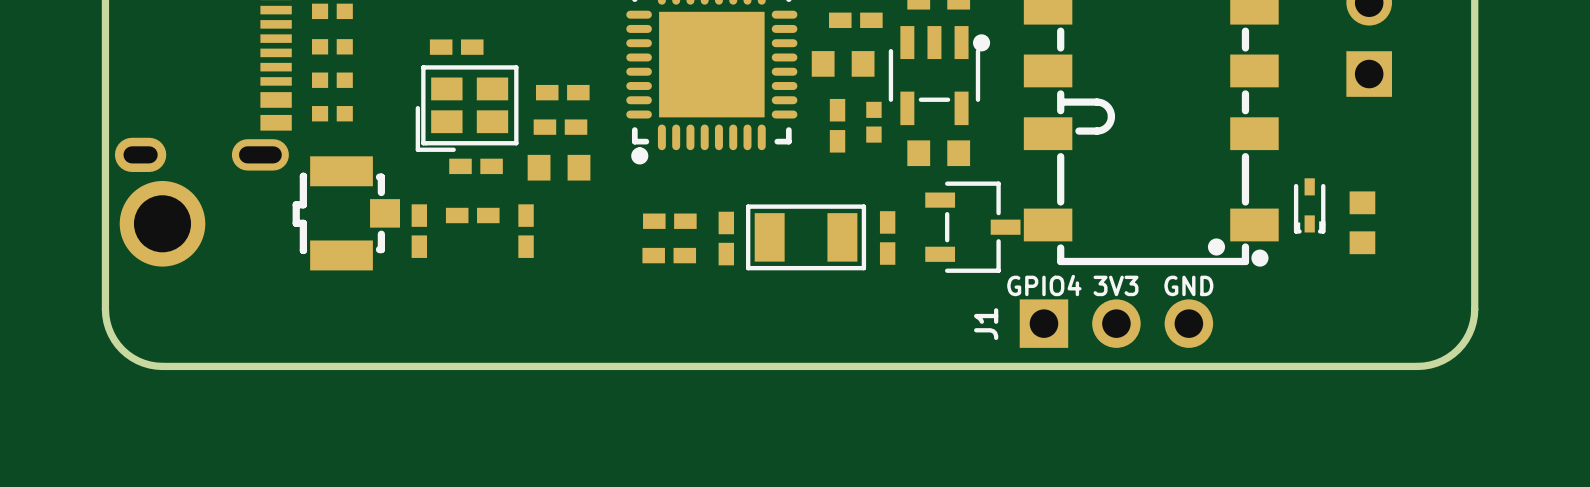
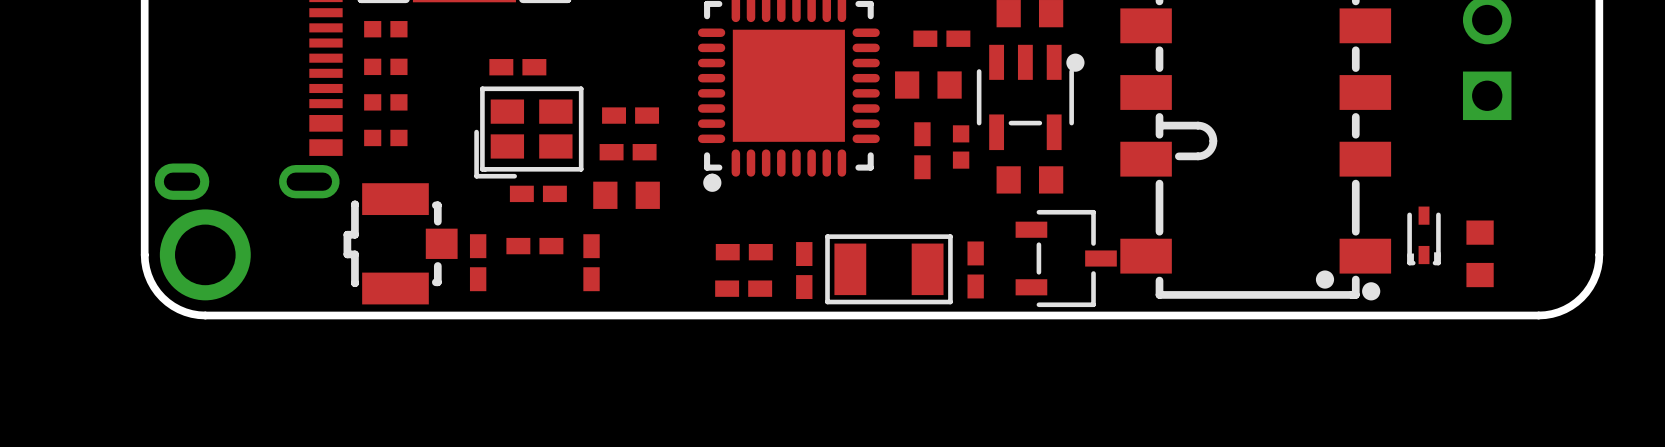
board edge: (105, 223) (105, 309) (108, 328) (117, 344) (132, 357) (143, 363) (162, 366) (1424, 366) (1442, 360) (1453, 353) (1465, 339) (1471, 328) (1474, 309) (1474, 223) -> (144, 254) (146, 268) (150, 281) (162, 297) (173, 306) (185, 312) (205, 315) (1538, 315) (1558, 312) (1570, 306) (1581, 297) (1590, 287) (1595, 274) (1599, 254)
text: GPIO4 (1044, 285) -> none
text: 3V3 (1116, 285) -> none
text: GND (1188, 285) -> none
J1: (1116, 323) -> none

